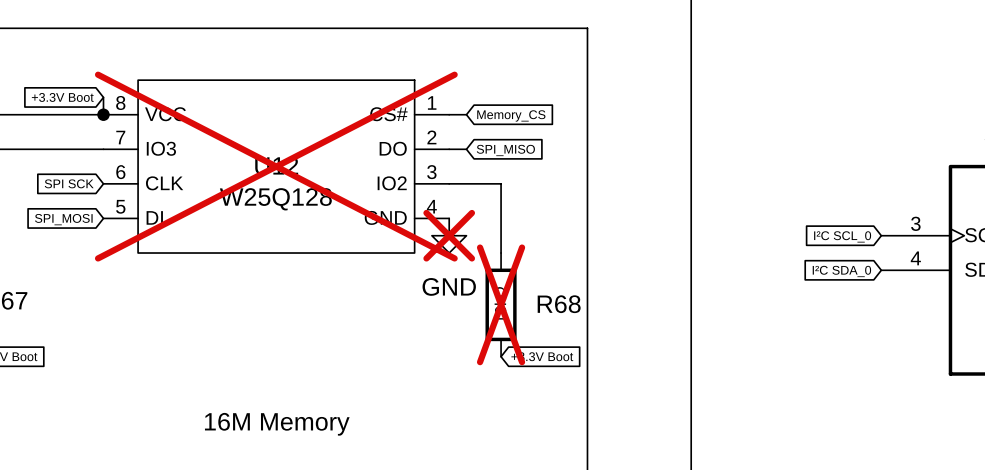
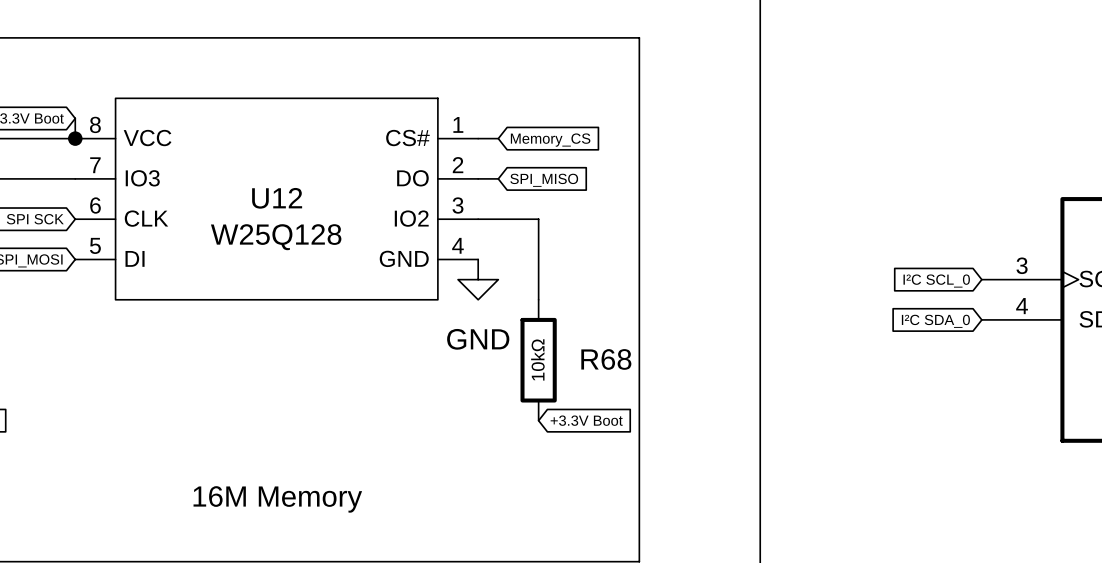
U12 do-not-place cross: (276, 166) -> none
power symbol do-not-place cross: (449, 235) -> none
R68 do-not-place cross: (501, 304) -> none

